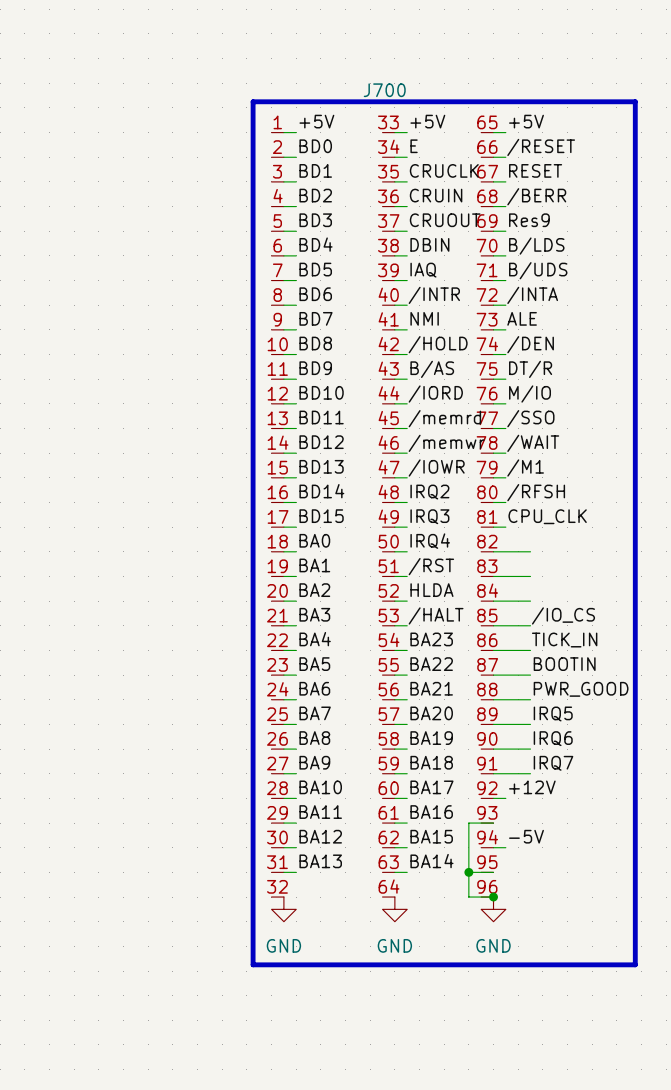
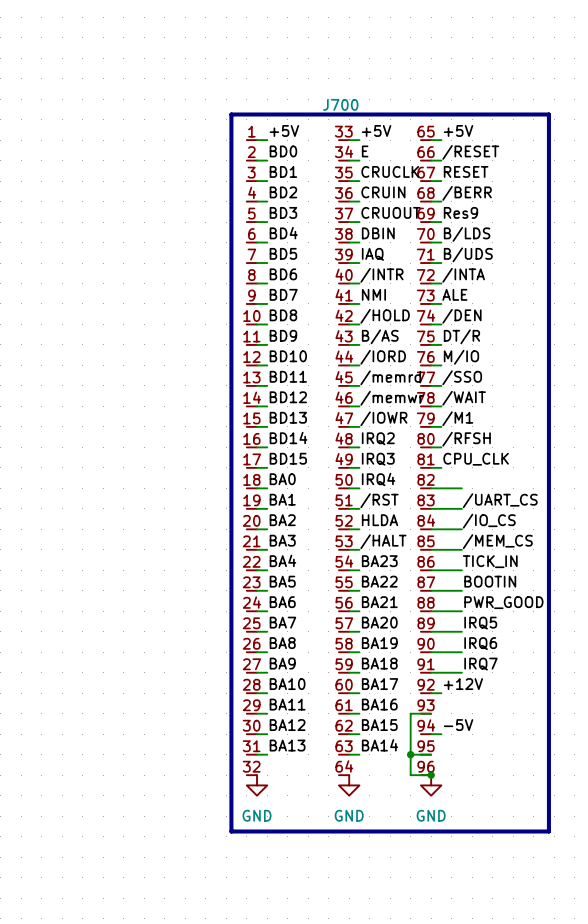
label: none -> /UART_CS (500, 500)
label: none -> /IO_CS (489, 521)
label: /IO_CS (563, 615) -> /MEM_CS (497, 541)

